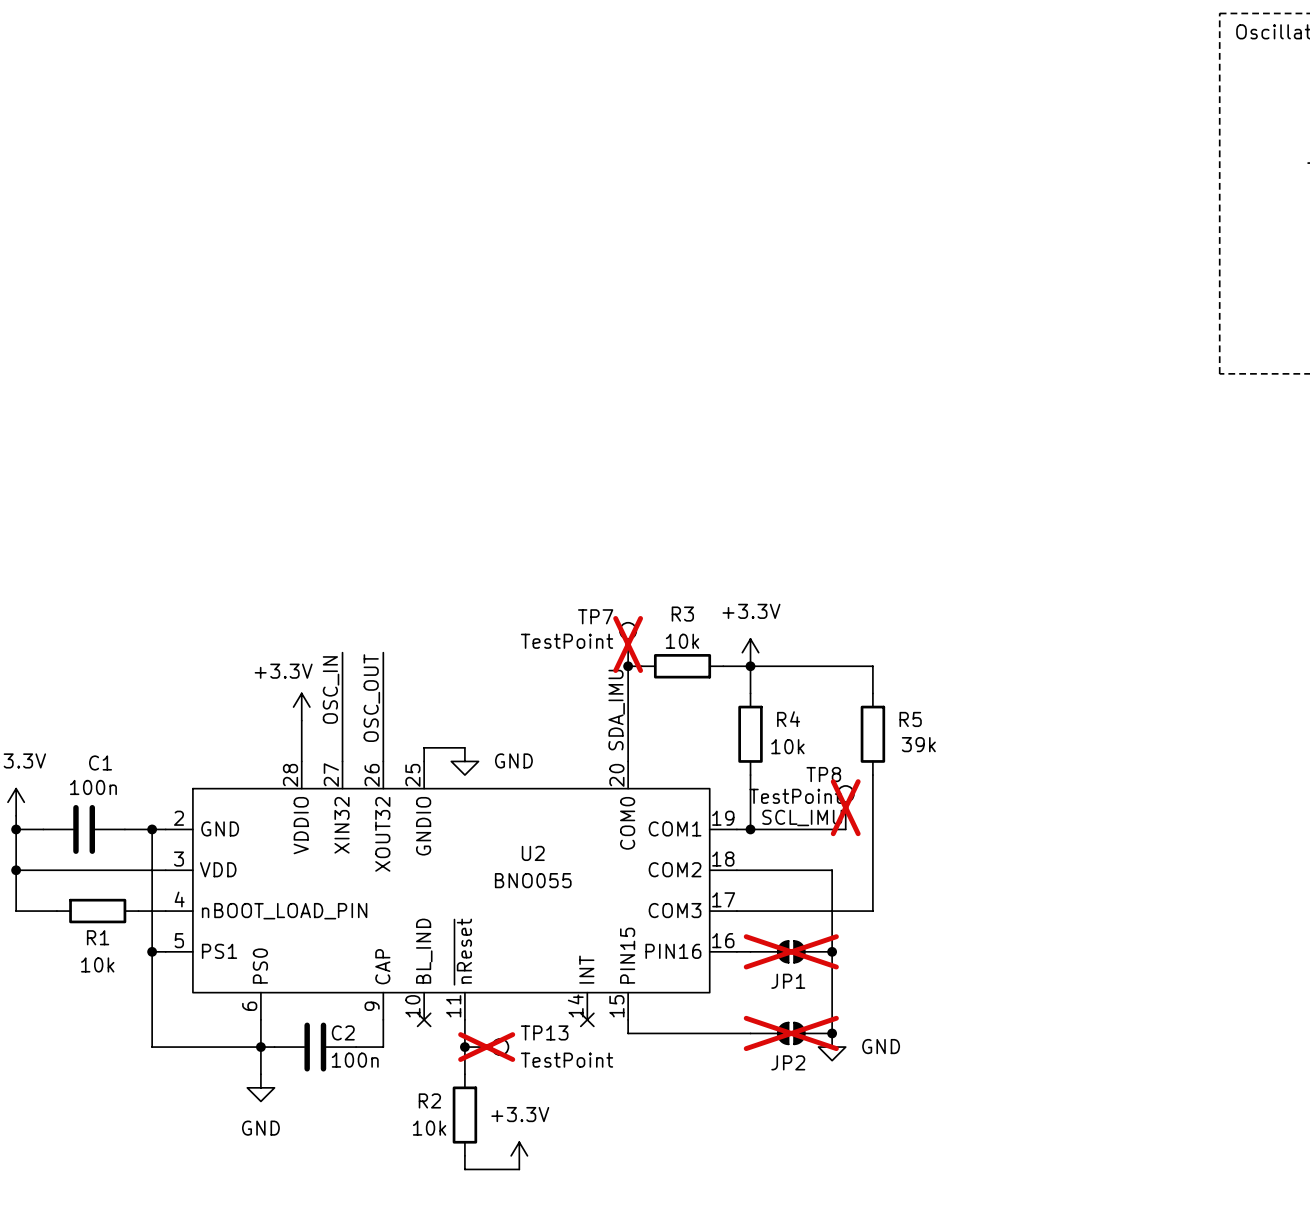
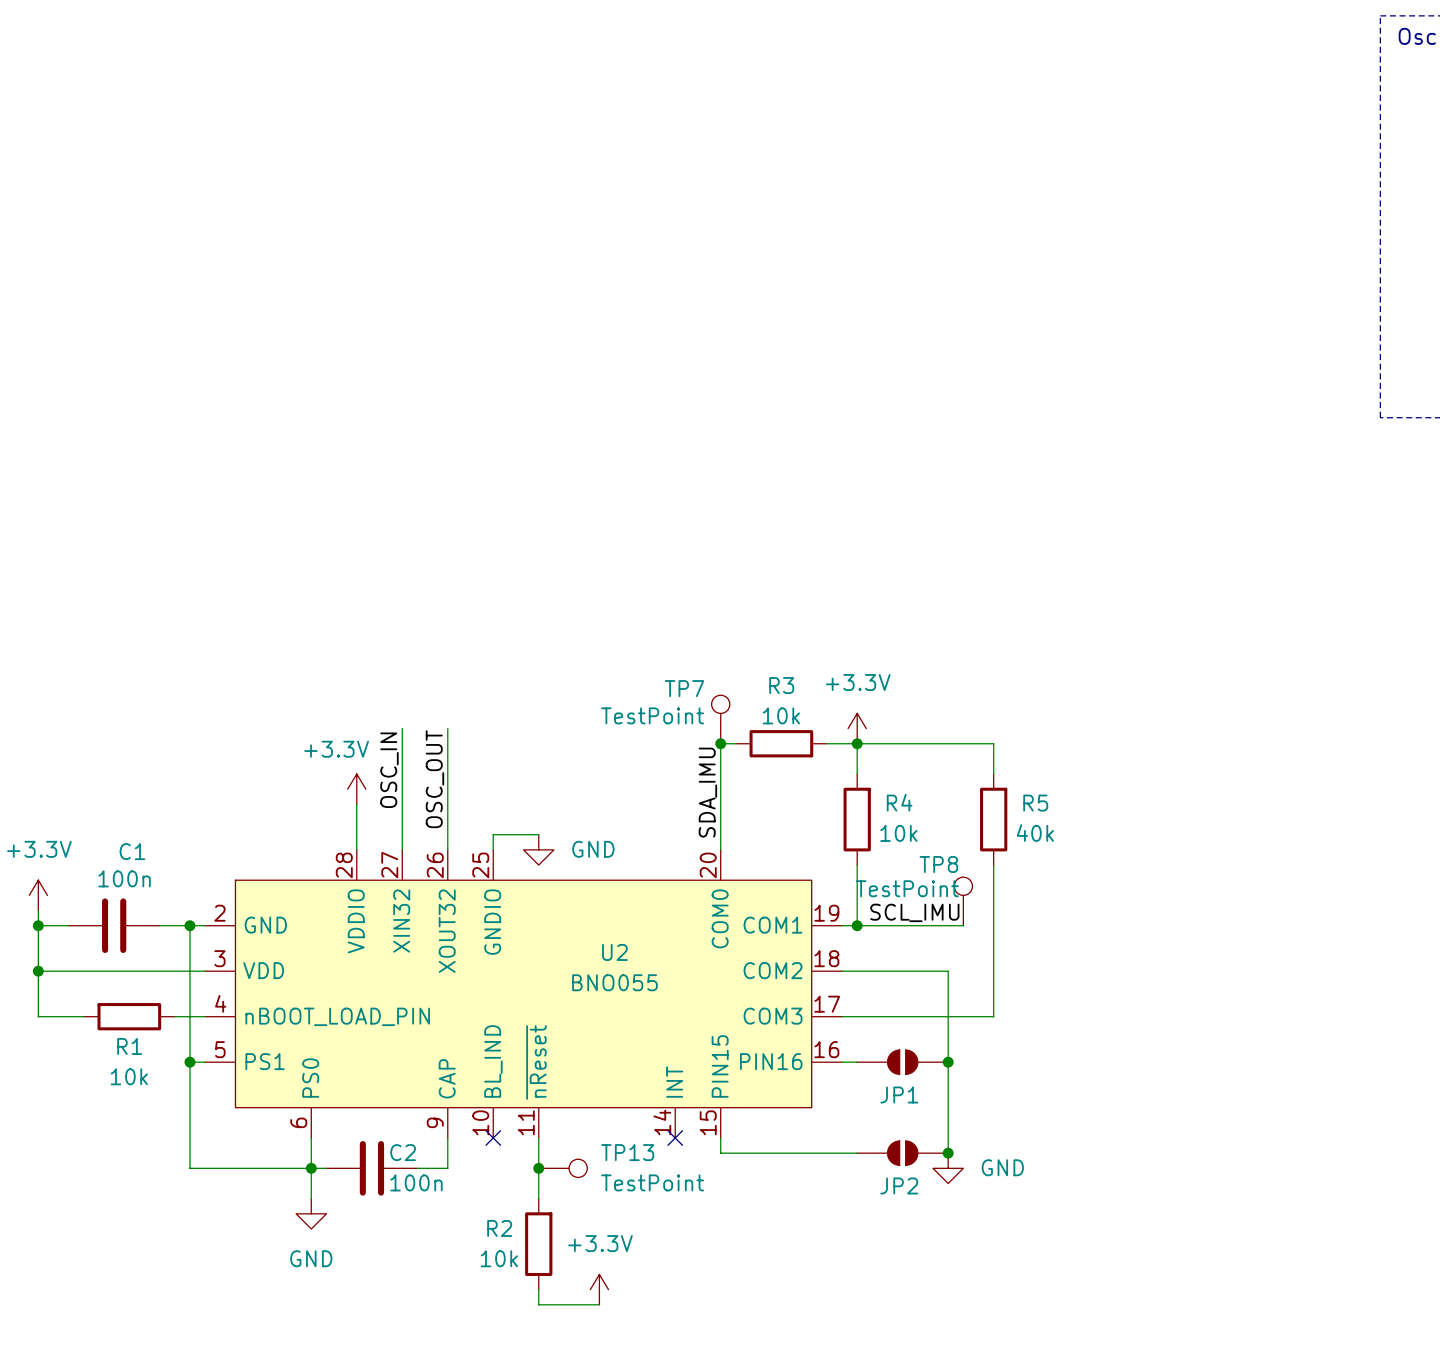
TP7 do-not-place cross: (628, 644) -> none
R5 value: 39k (918, 744) -> 40k (1035, 833)
TP8 do-not-place cross: (845, 807) -> none
JP1 do-not-place cross: (791, 951) -> none
JP2 do-not-place cross: (791, 1033) -> none
TP13 do-not-place cross: (486, 1047) -> none

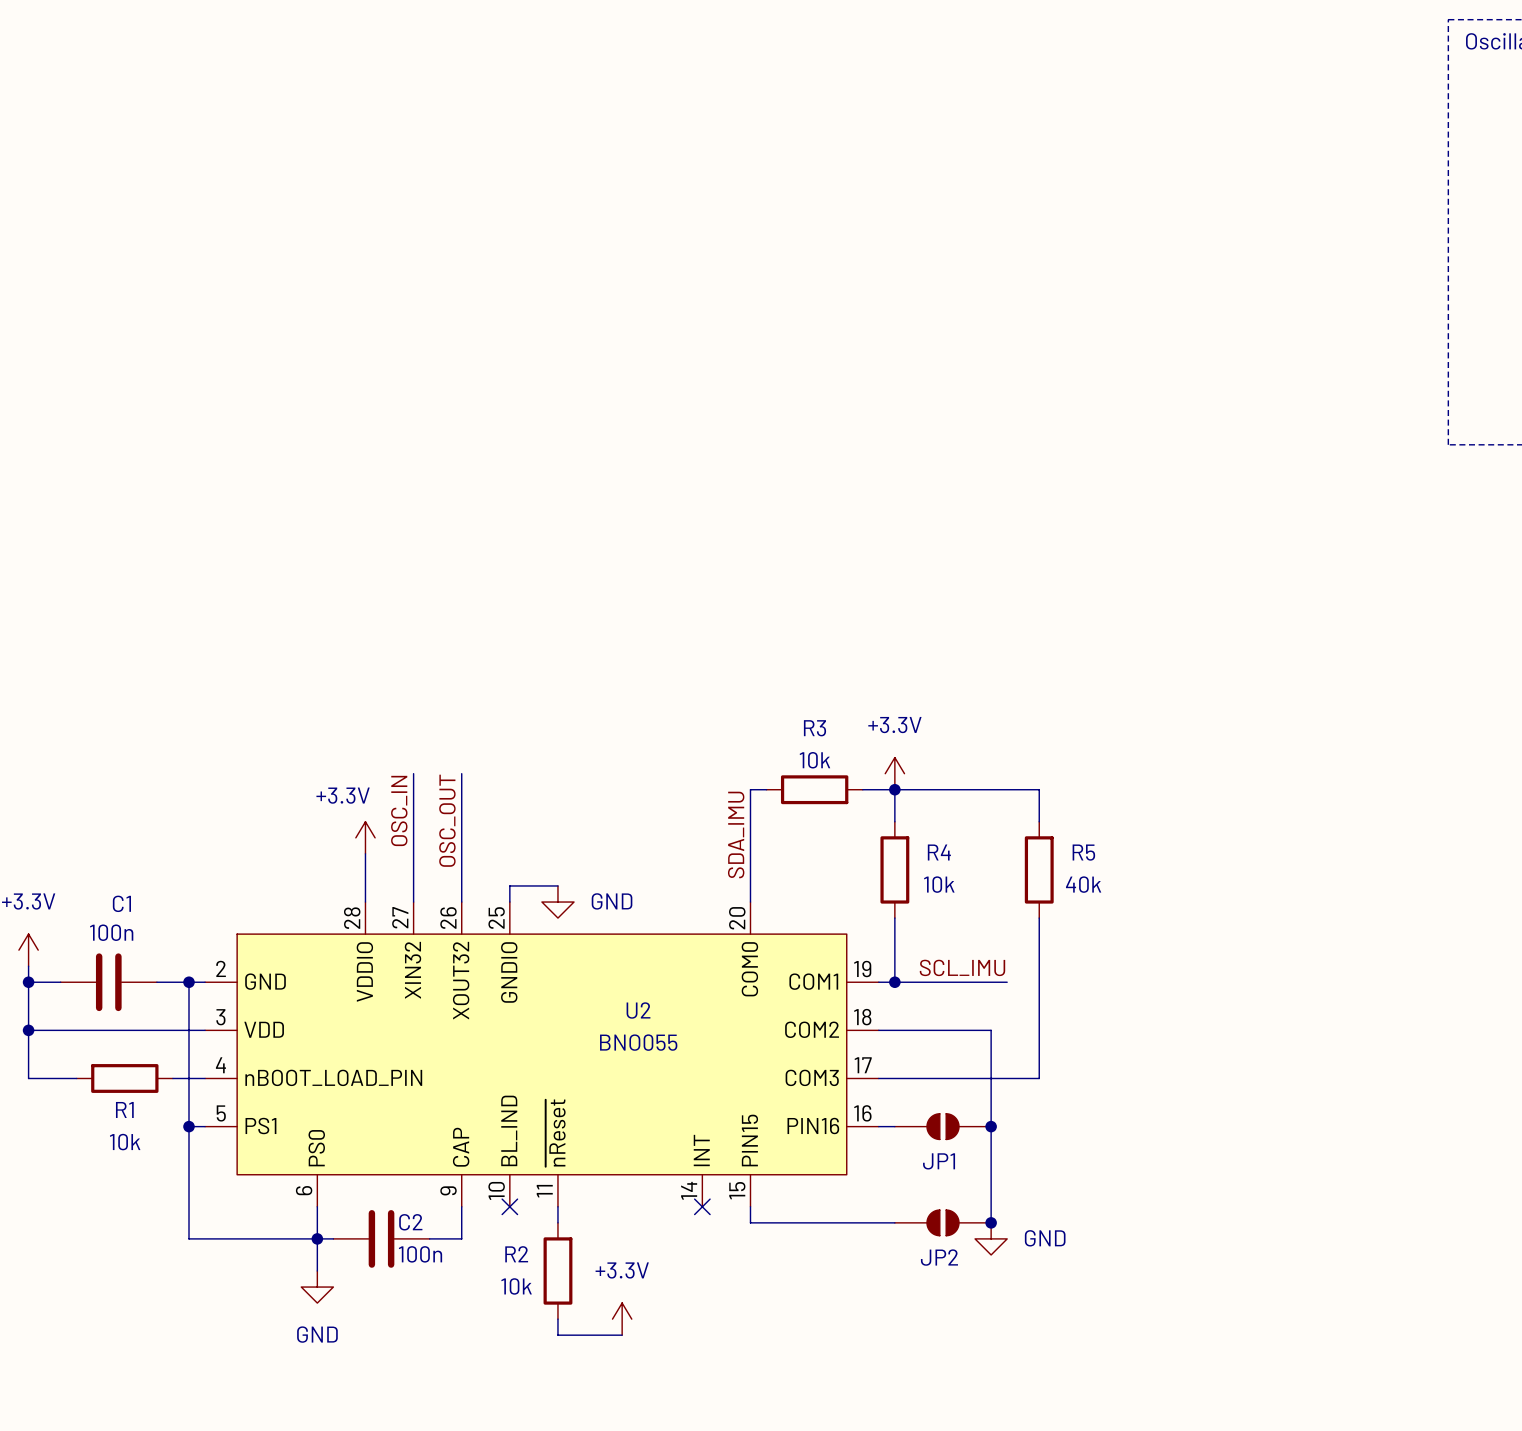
TP7: TestPoint (720, 719) -> none
junction: (720, 743) -> none
TP8: TestPoint (963, 901) -> none
wire: (538, 1153) (538, 1198) -> none
junction: (538, 1168) -> none
TP13: TestPoint (563, 1168) -> none
R2 position: (538, 1244) -> (557, 1271)
wire: (538, 1289) (538, 1304) (599, 1304) -> (557, 1319) (557, 1335) (622, 1335)
power symbol position: +3.3V (599, 1289) -> +3.3V (622, 1319)

